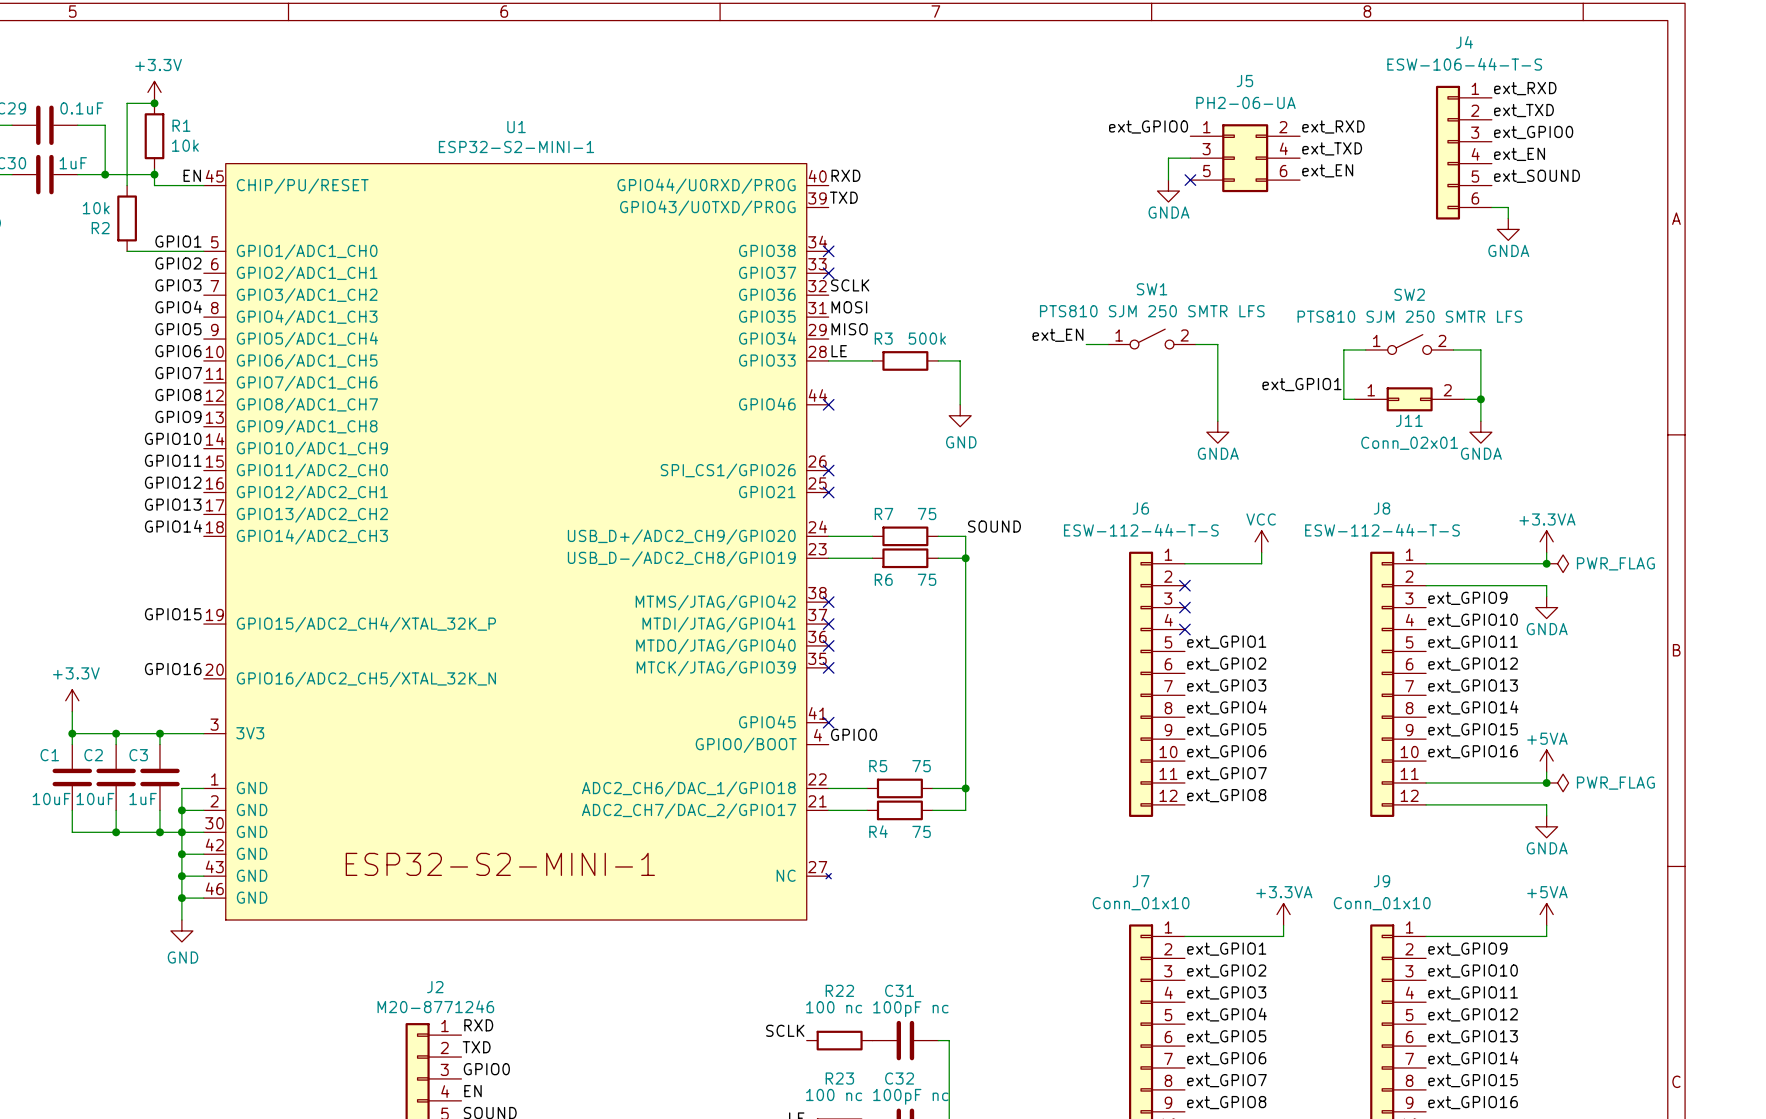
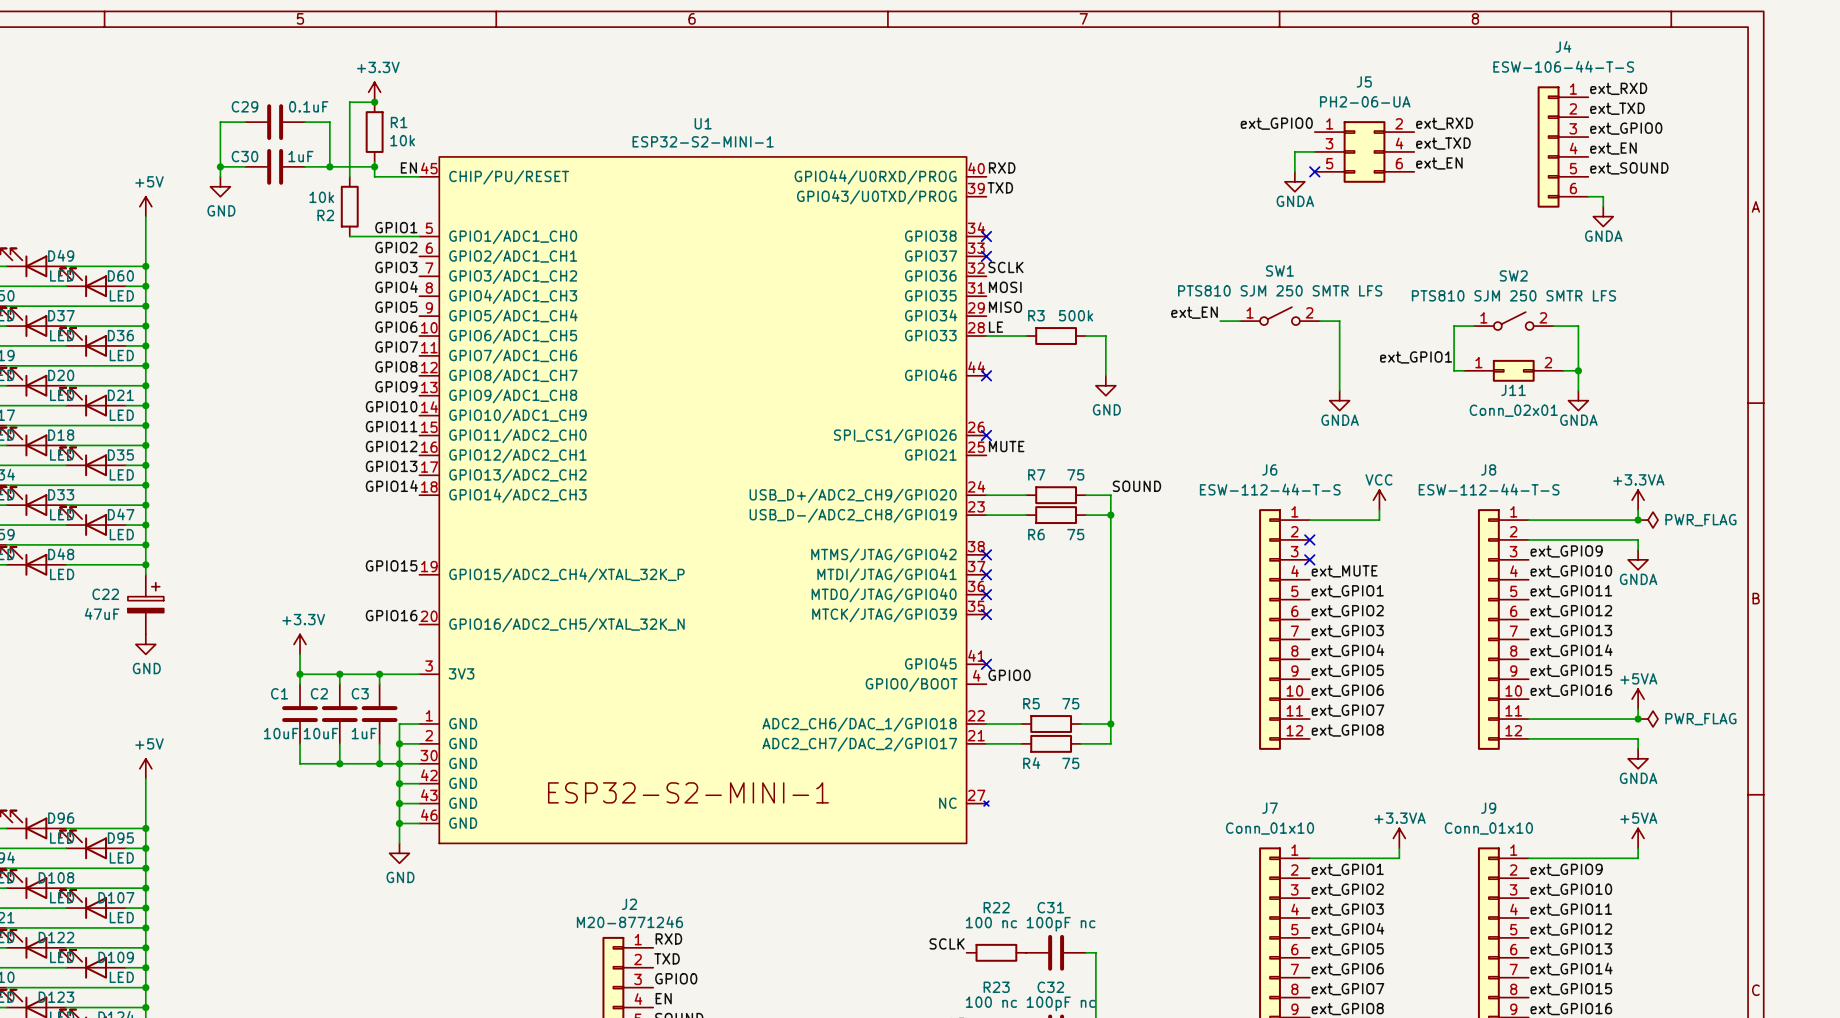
label: none -> MUTE (1006, 446)
no-connect mark: (828, 492) -> none
label: none -> ext_MUTE (1344, 571)
no-connect mark: (1184, 629) -> none

